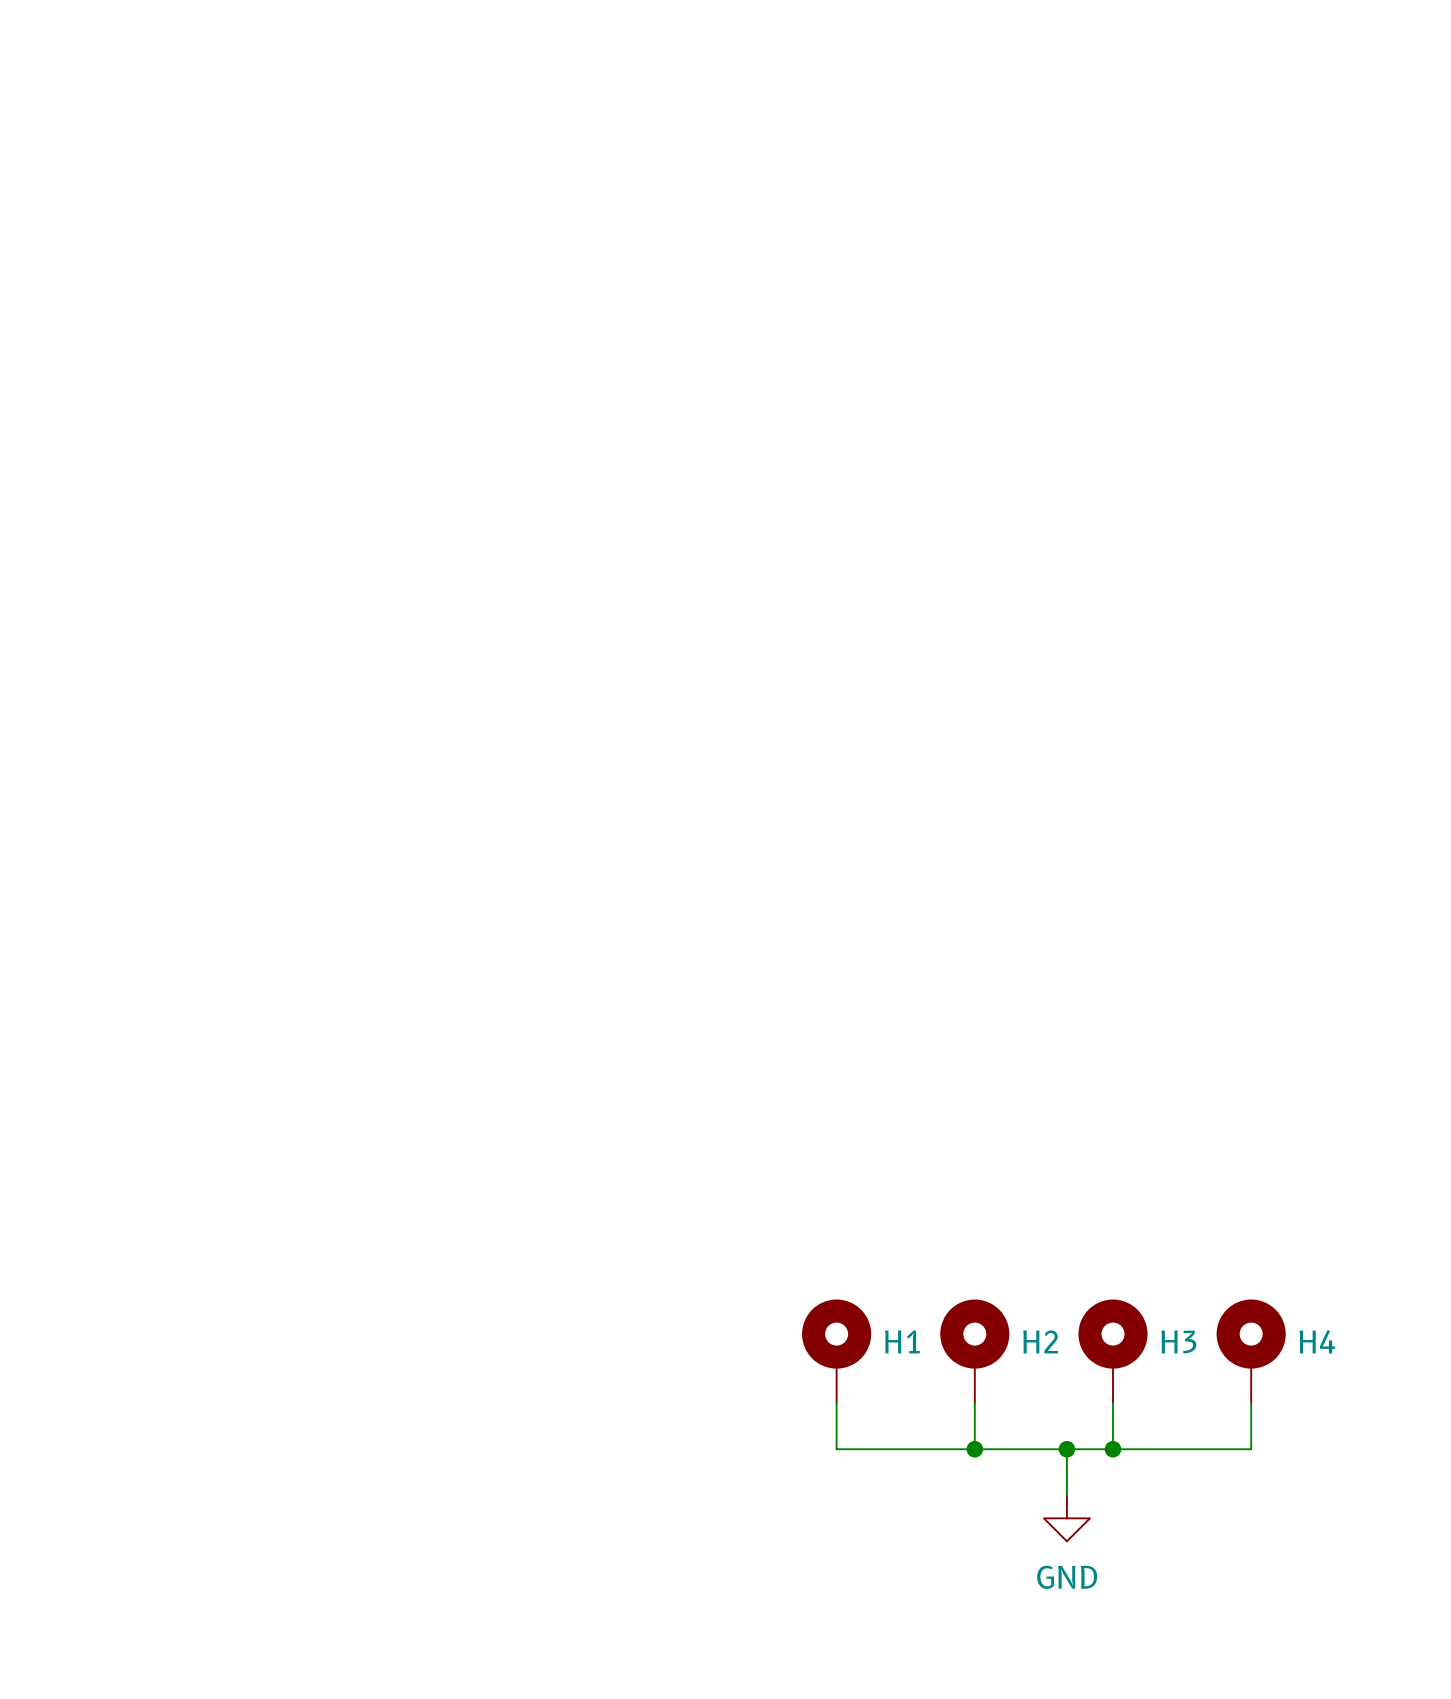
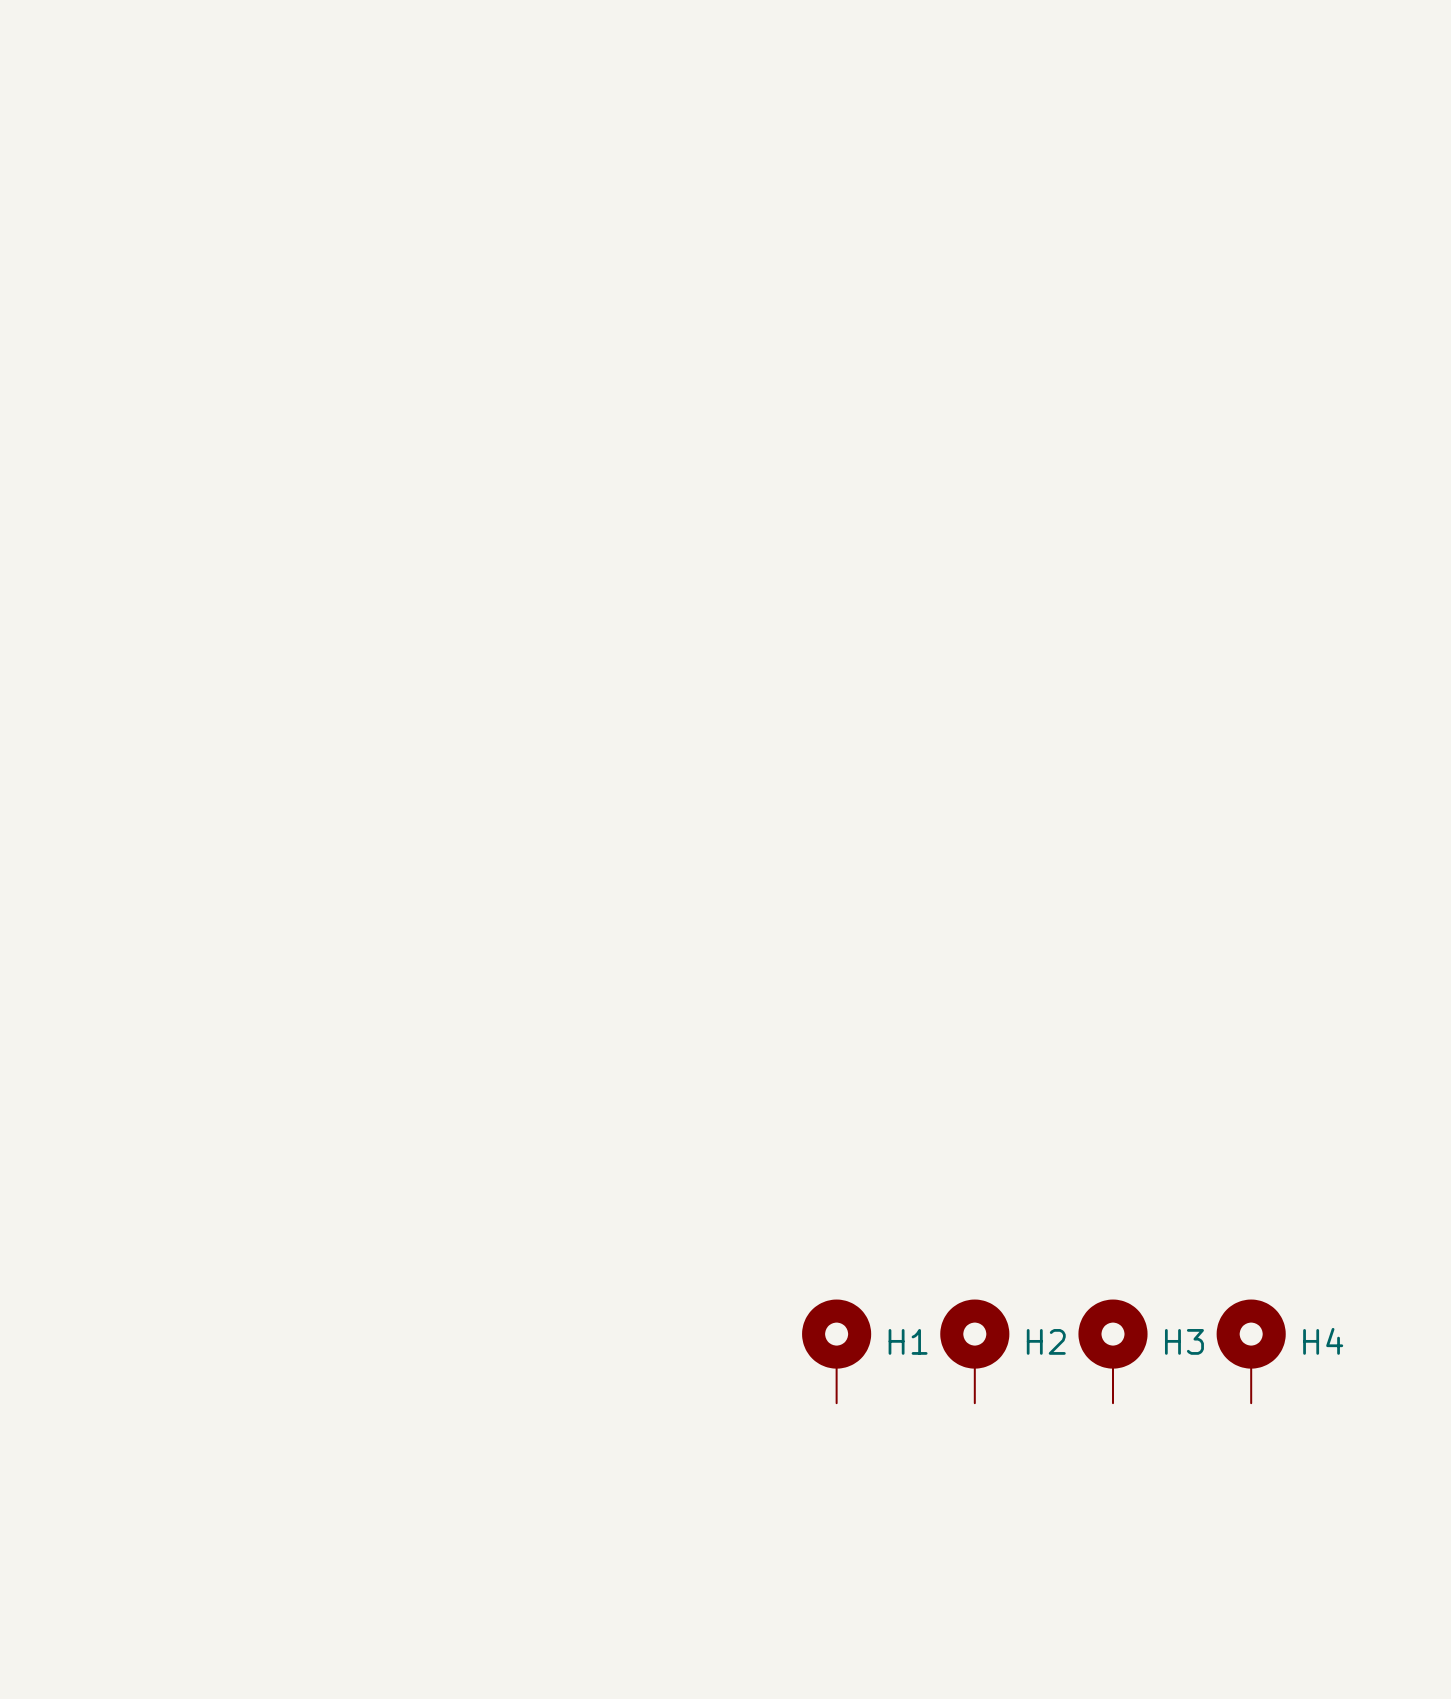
wire: (836, 1403) (836, 1449) (1251, 1449) (1251, 1403) -> none
wire: (974, 1403) (974, 1449) -> none
wire: (1112, 1403) (1112, 1449) -> none
junction: (974, 1449) -> none
wire: (1066, 1449) (1066, 1495) -> none
junction: (1066, 1449) -> none
junction: (1112, 1449) -> none
power symbol: GND (1066, 1518) -> none

